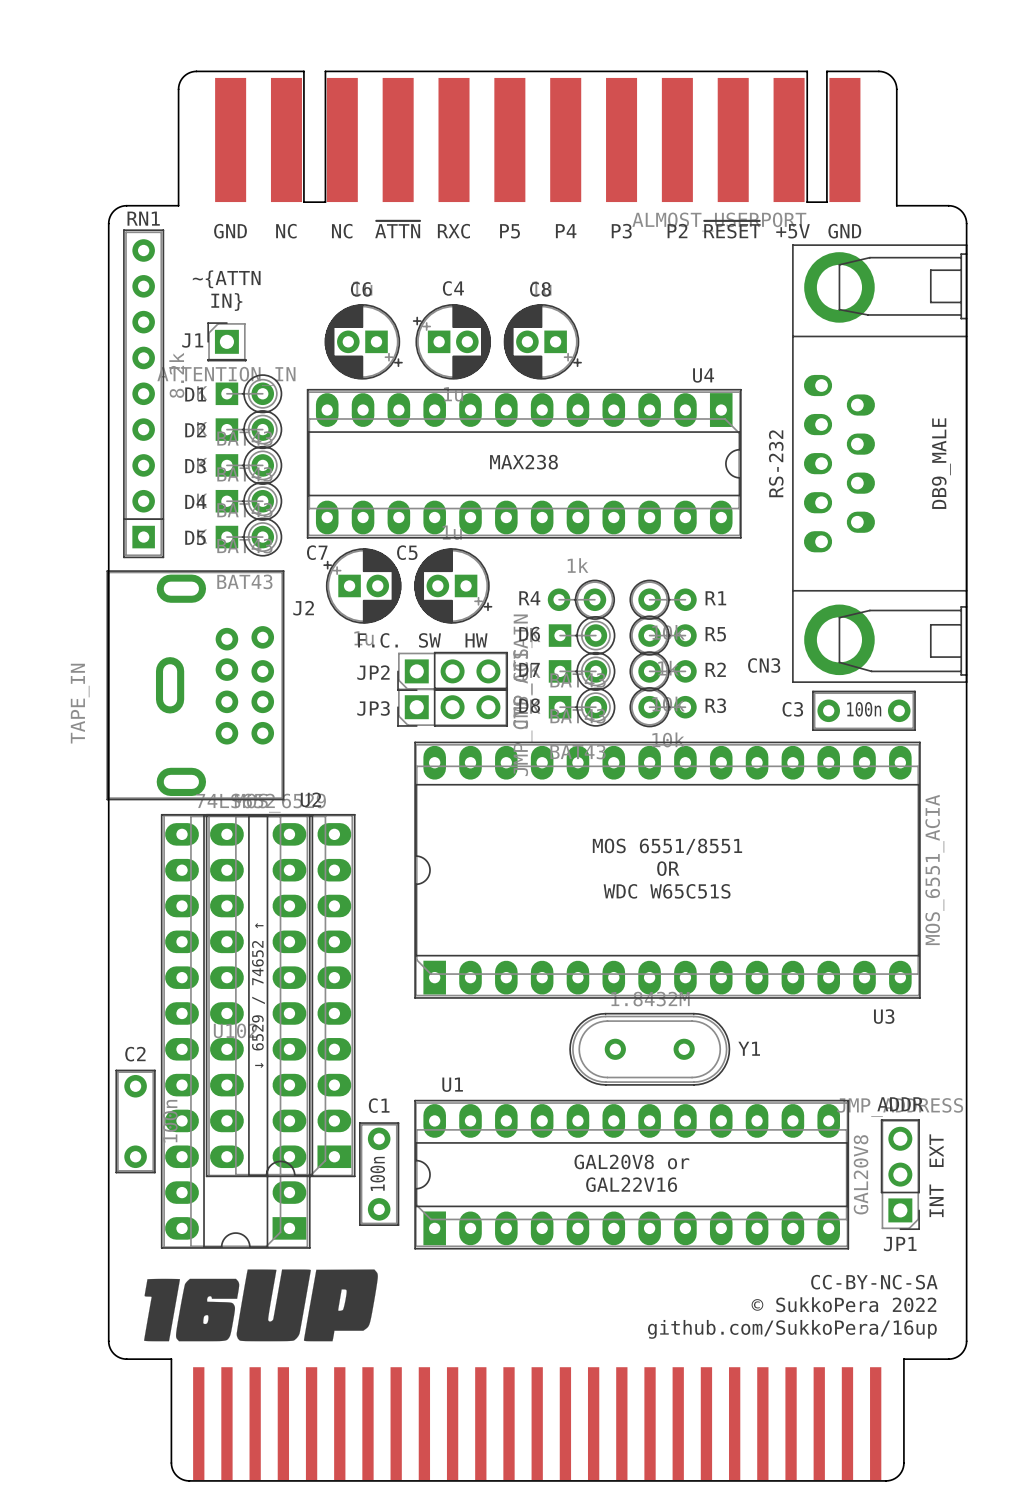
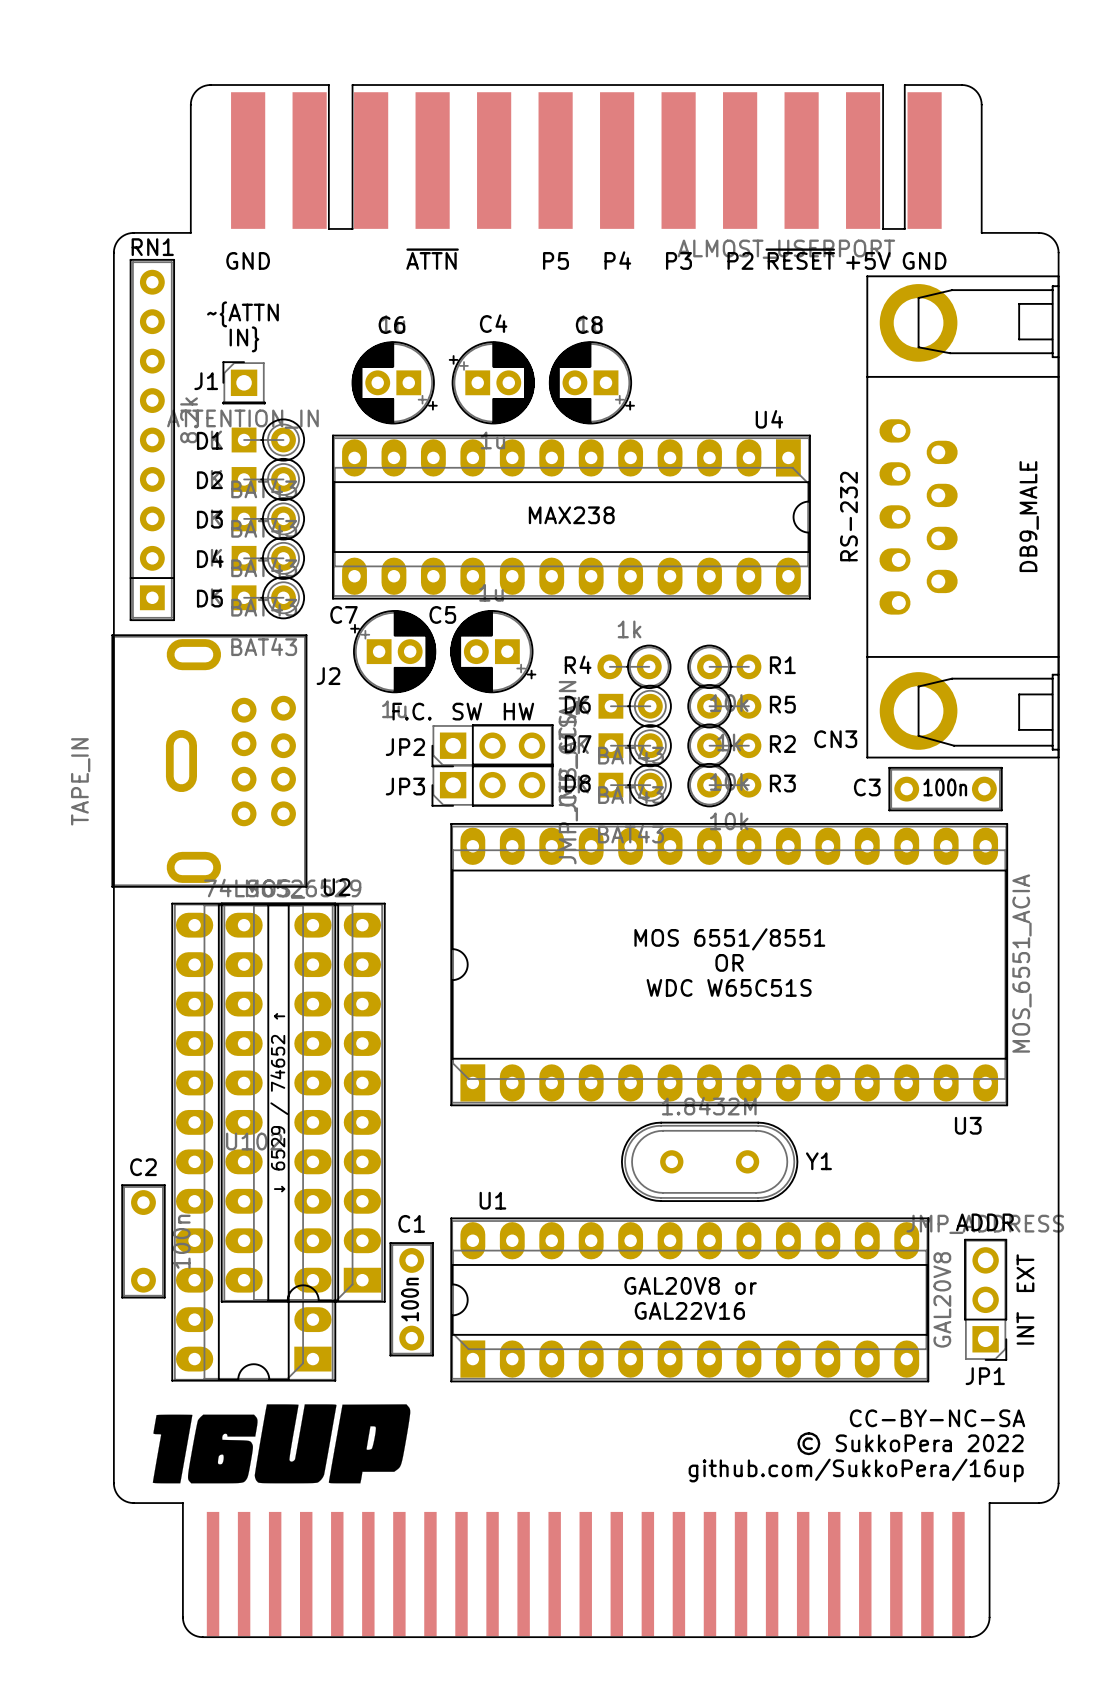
text: NC (286, 231) -> none
text: NC (342, 231) -> none
text: RXC (453, 231) -> none

